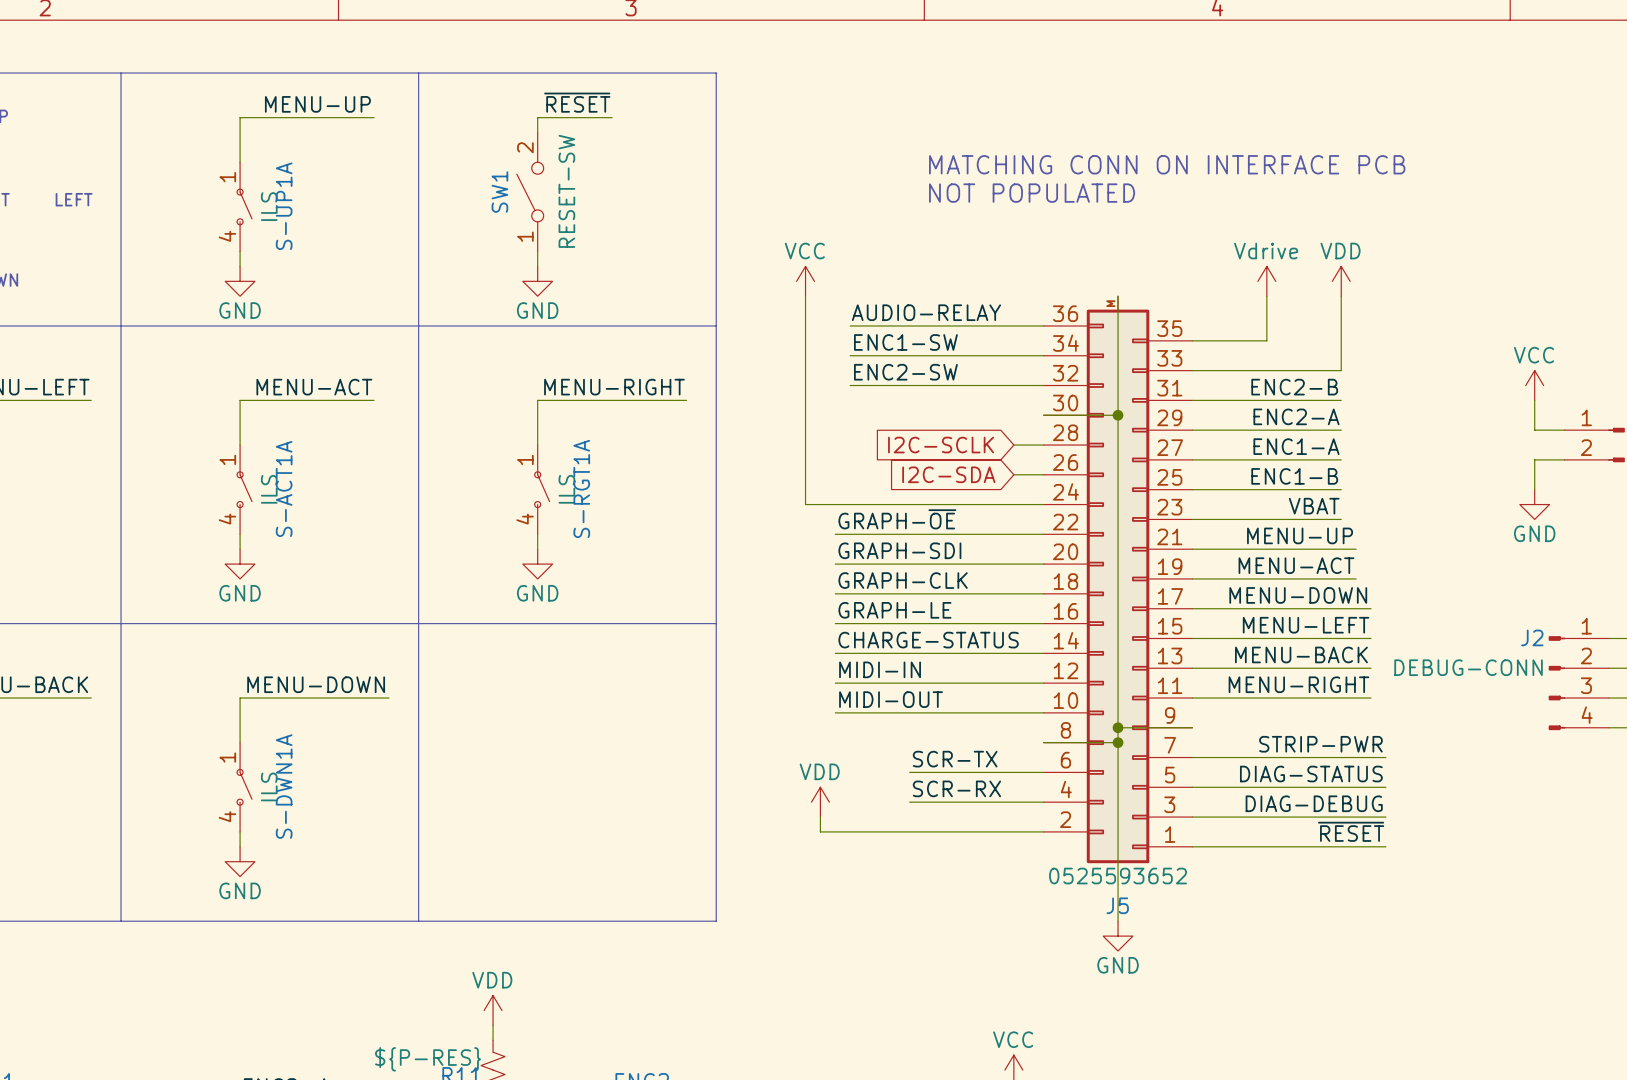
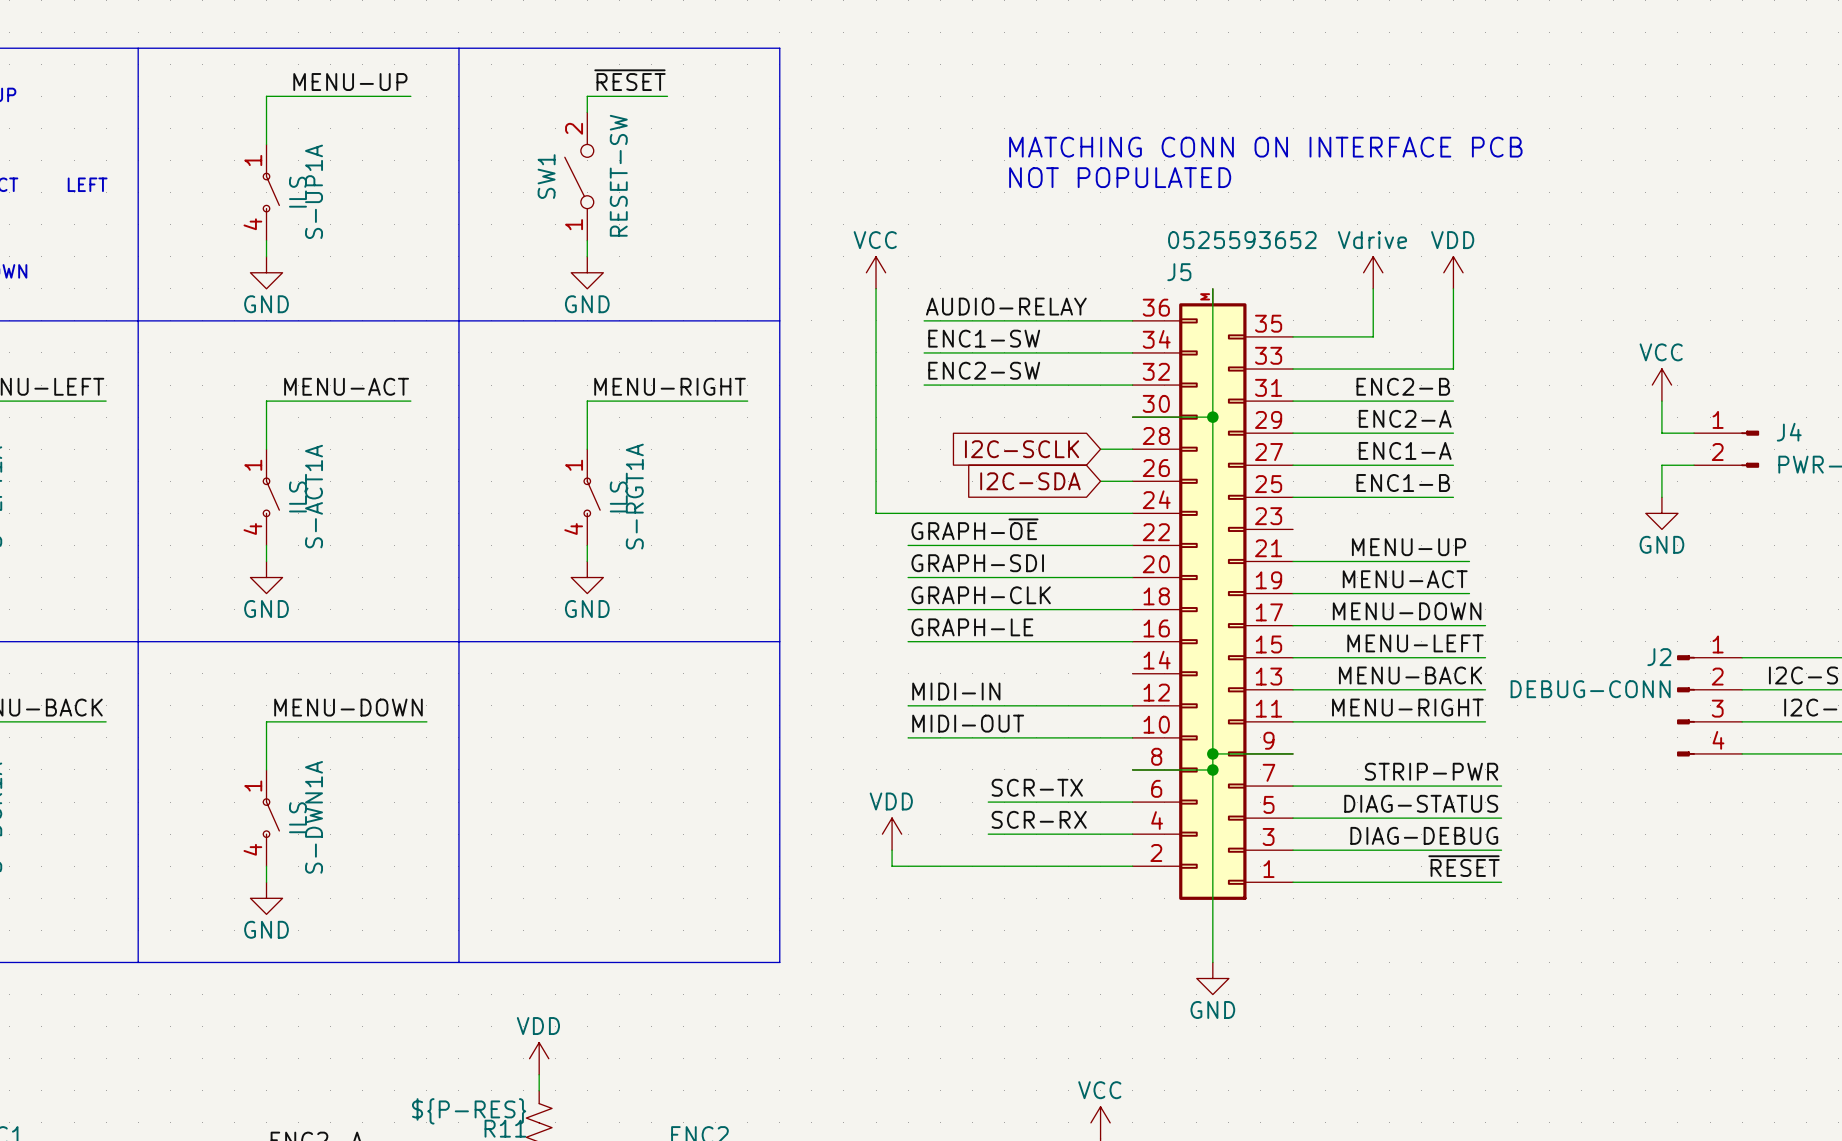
label: VBAT (1314, 506) -> none
wire: (1192, 519) (1341, 519) -> none
label: CHARGE-STATUS (928, 640) -> none
wire: (835, 653) (1043, 653) -> none
J5 value position: 0525593652 (1118, 876) -> 0525593652 (1242, 240)
J5 name position: J5 (1117, 905) -> J5 (1179, 272)

